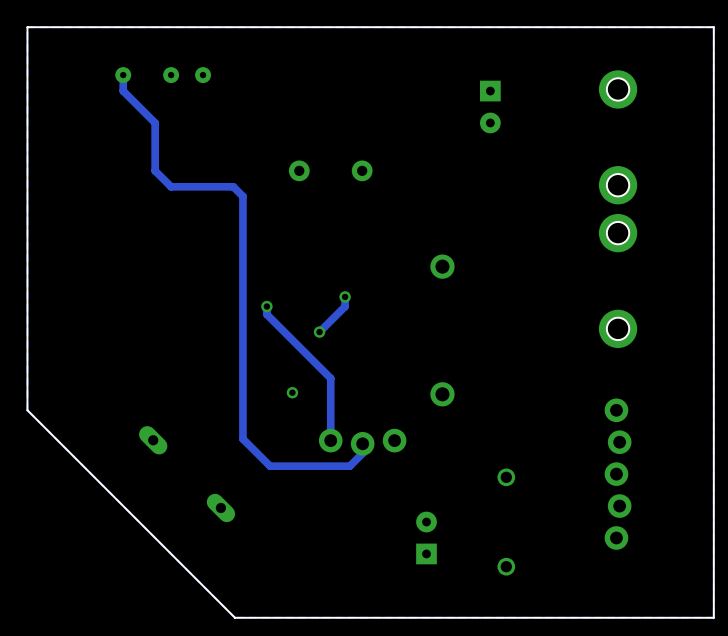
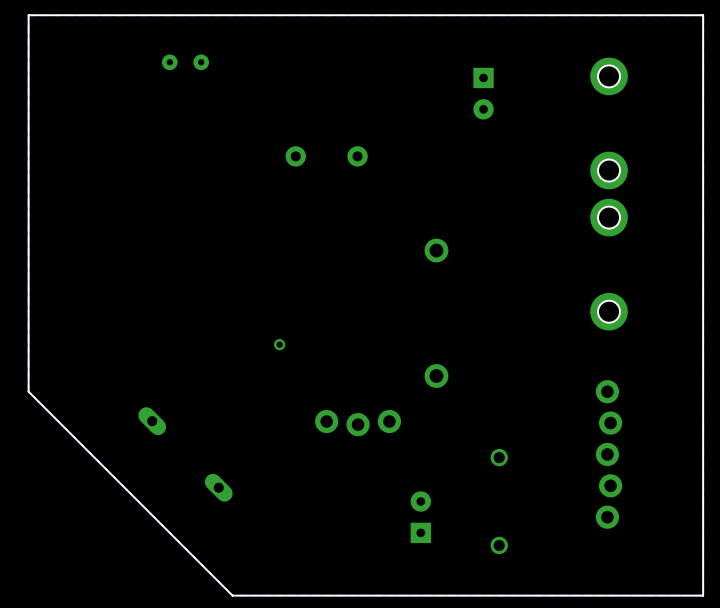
track: (123, 75) (123, 91) (155, 122) (155, 170) (171, 186) (233, 186) (242, 196) (242, 439) (270, 466) (349, 466) (362, 453) (362, 443) -> none
via: (123, 75) -> none
track: (345, 296) (345, 306) (319, 332) -> none
via: (345, 296) -> none
track: (266, 306) (266, 314) (330, 378) (330, 440) -> none
via: (266, 306) -> none
via: (319, 332) -> none
via: none -> (279, 344)
via: (292, 392) -> none

